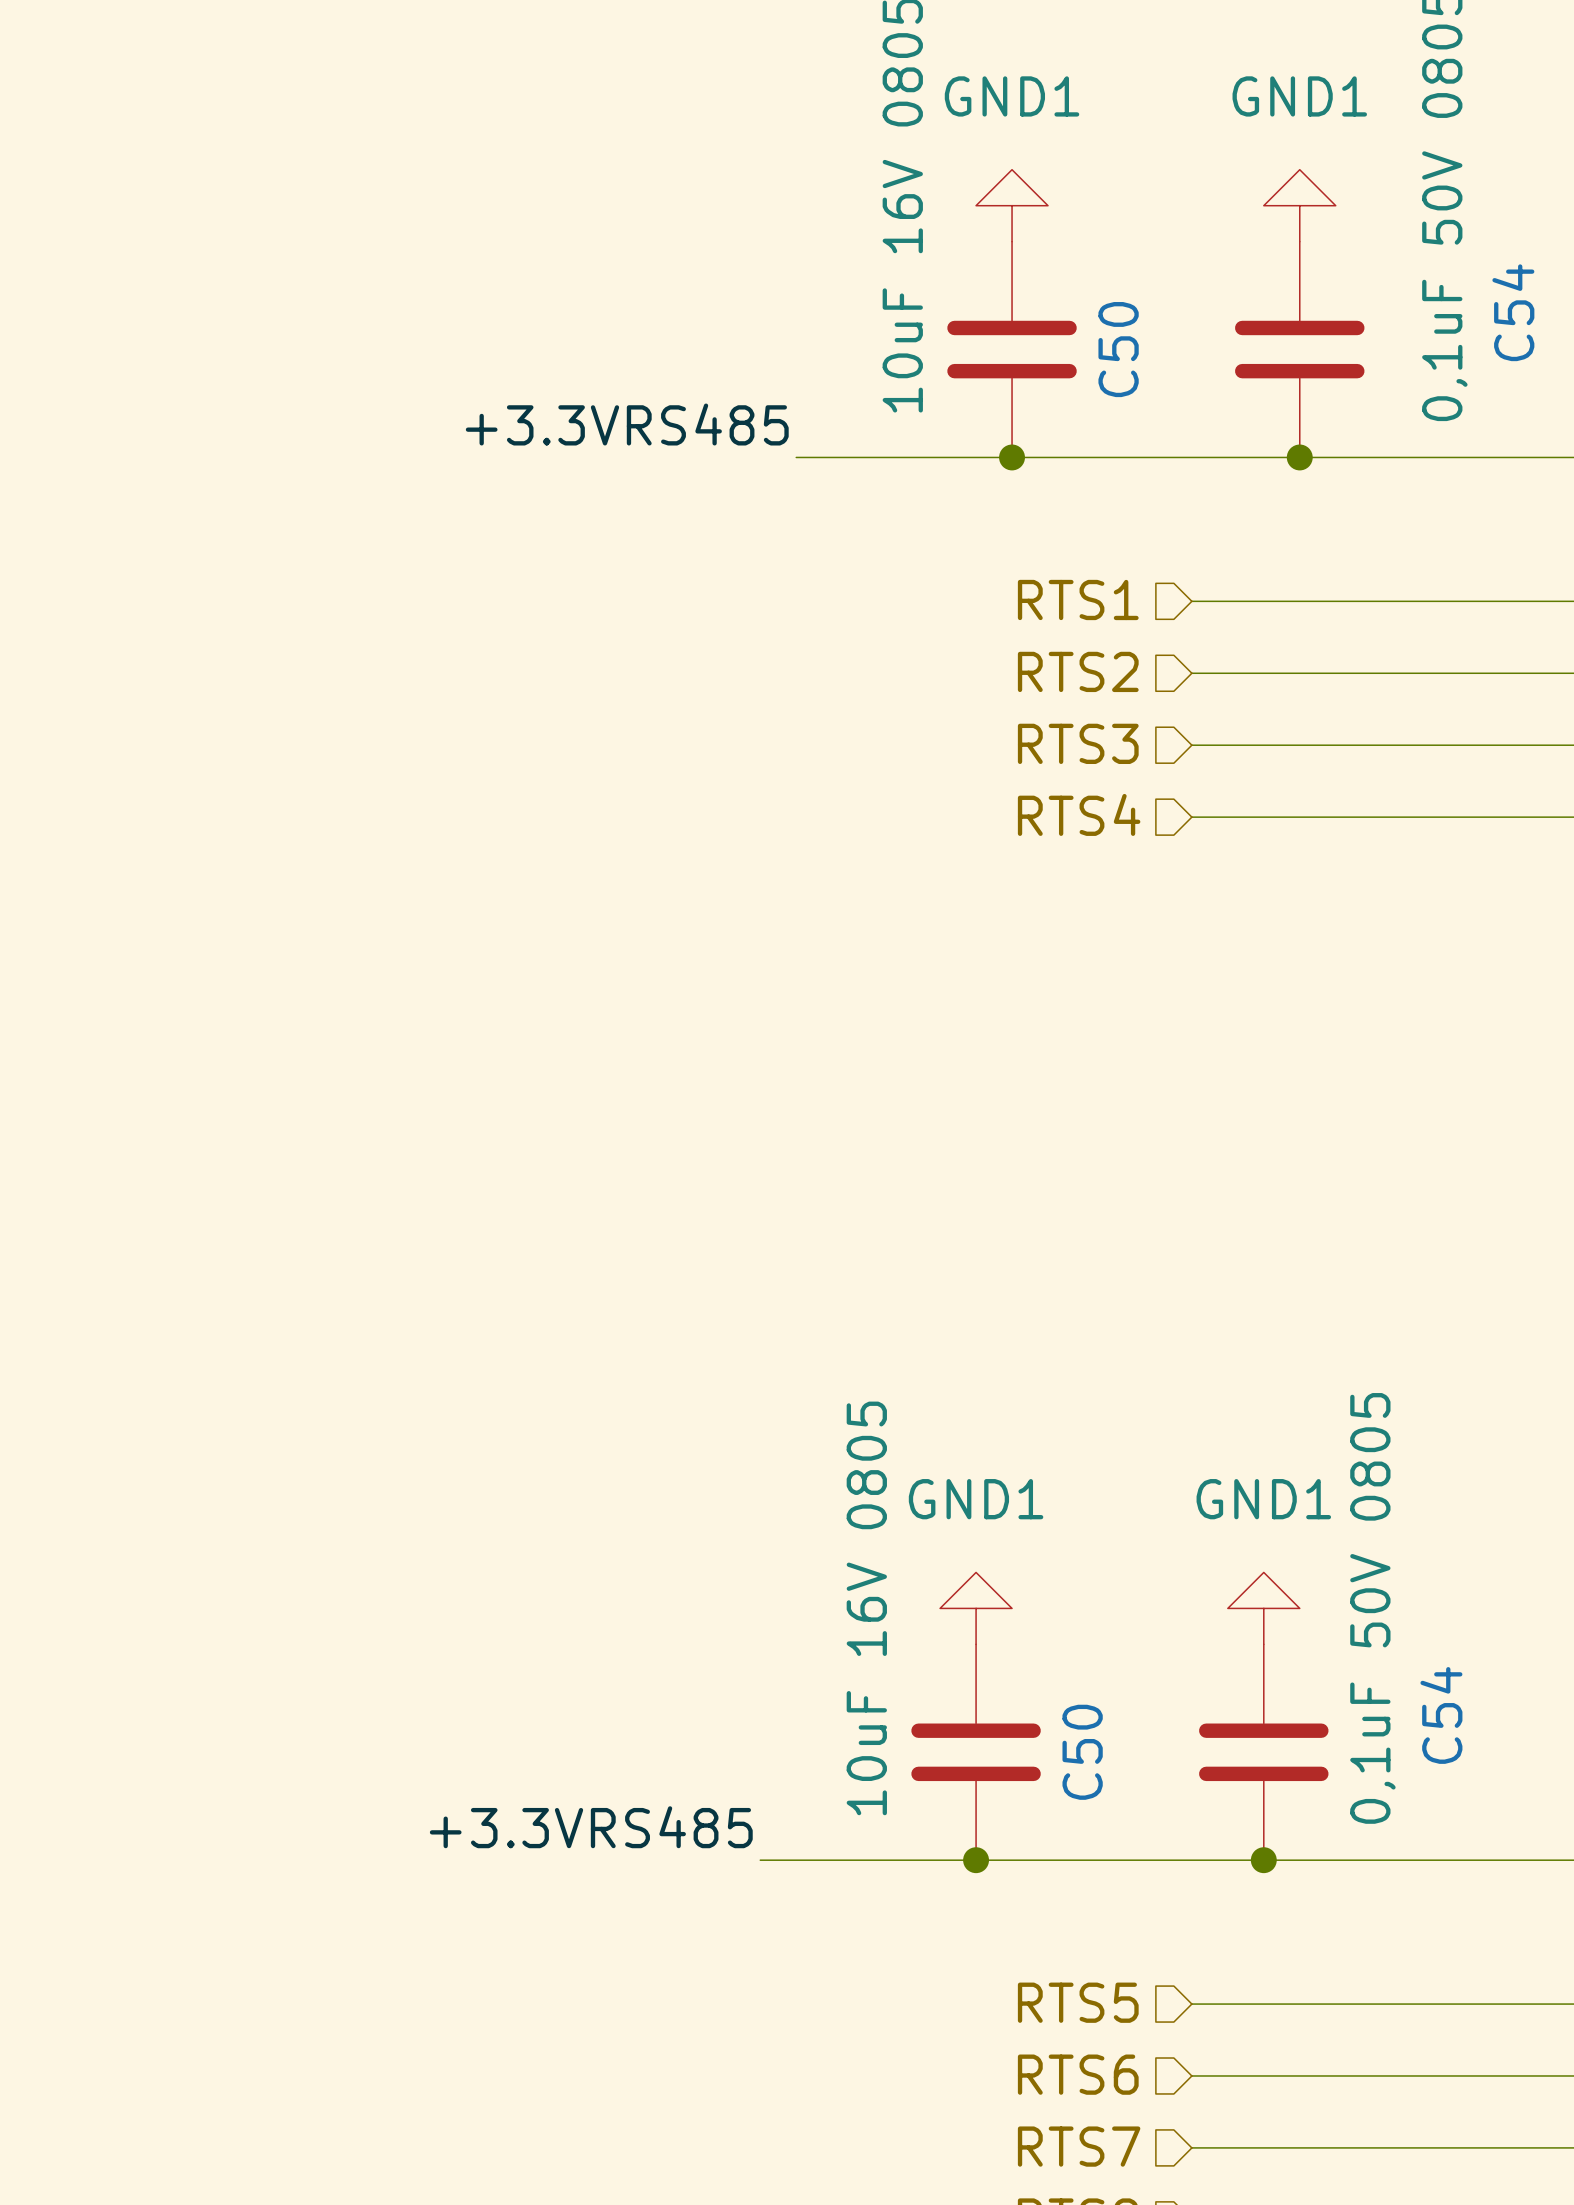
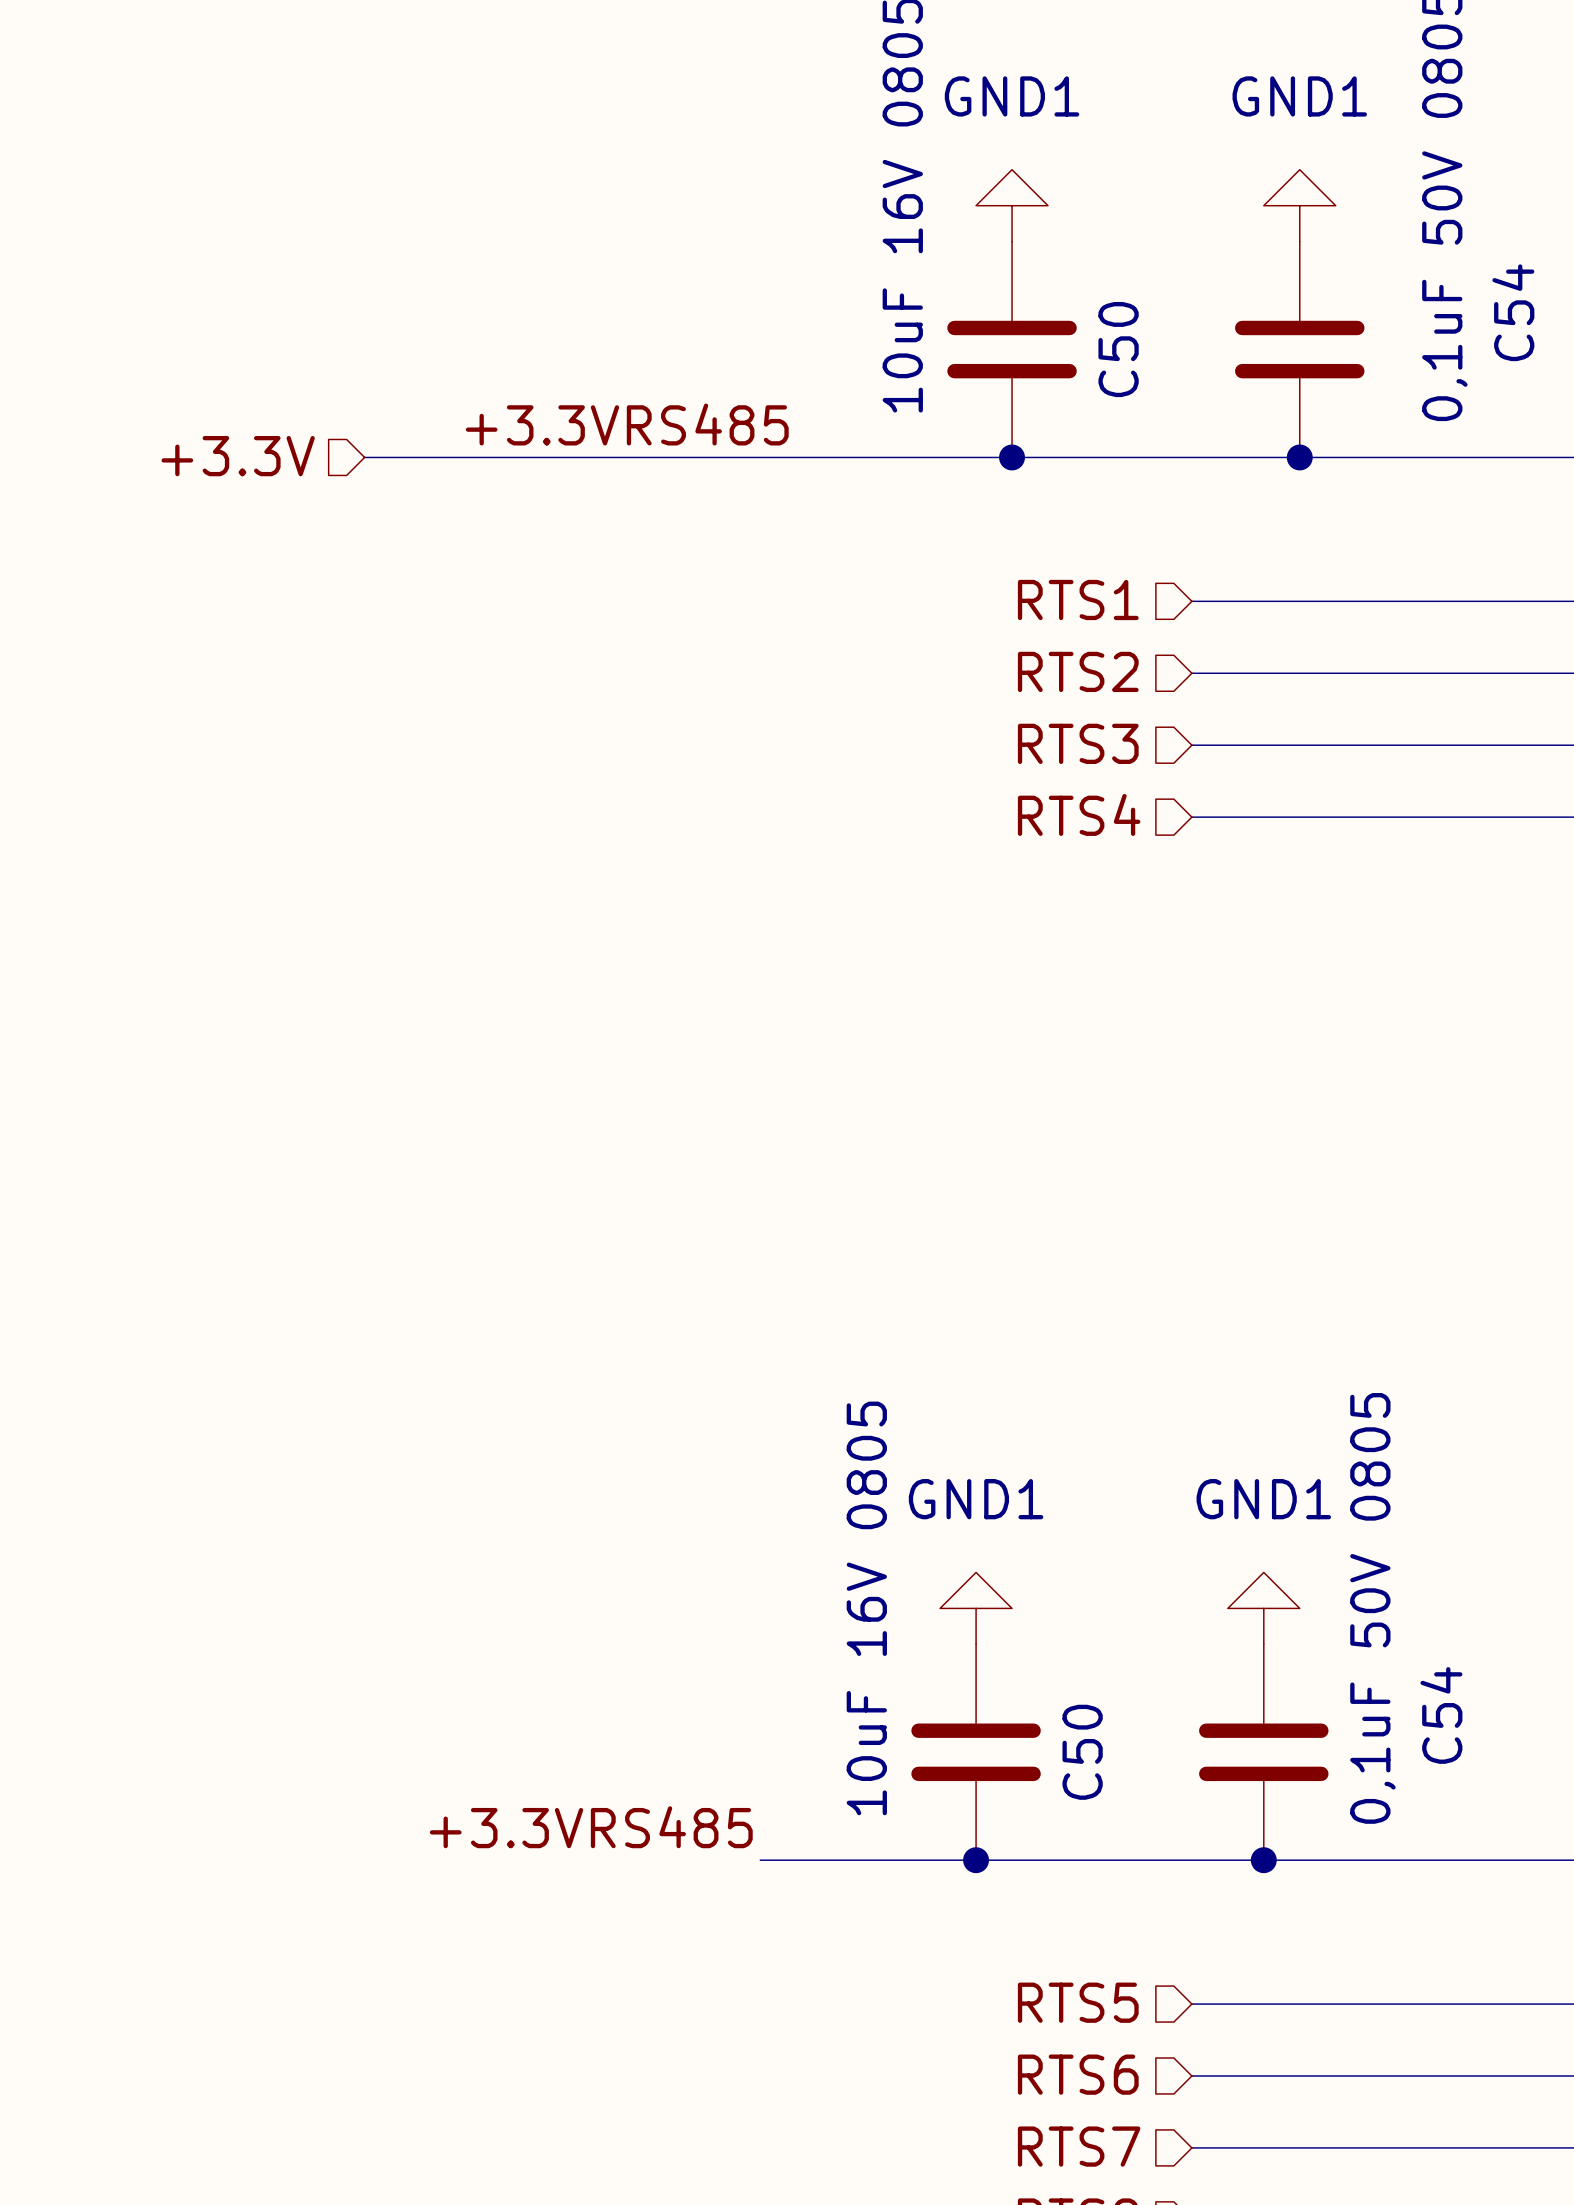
hierarchical label: none -> +3.3V (238, 456)
wire: none -> (364, 457) (796, 457)

